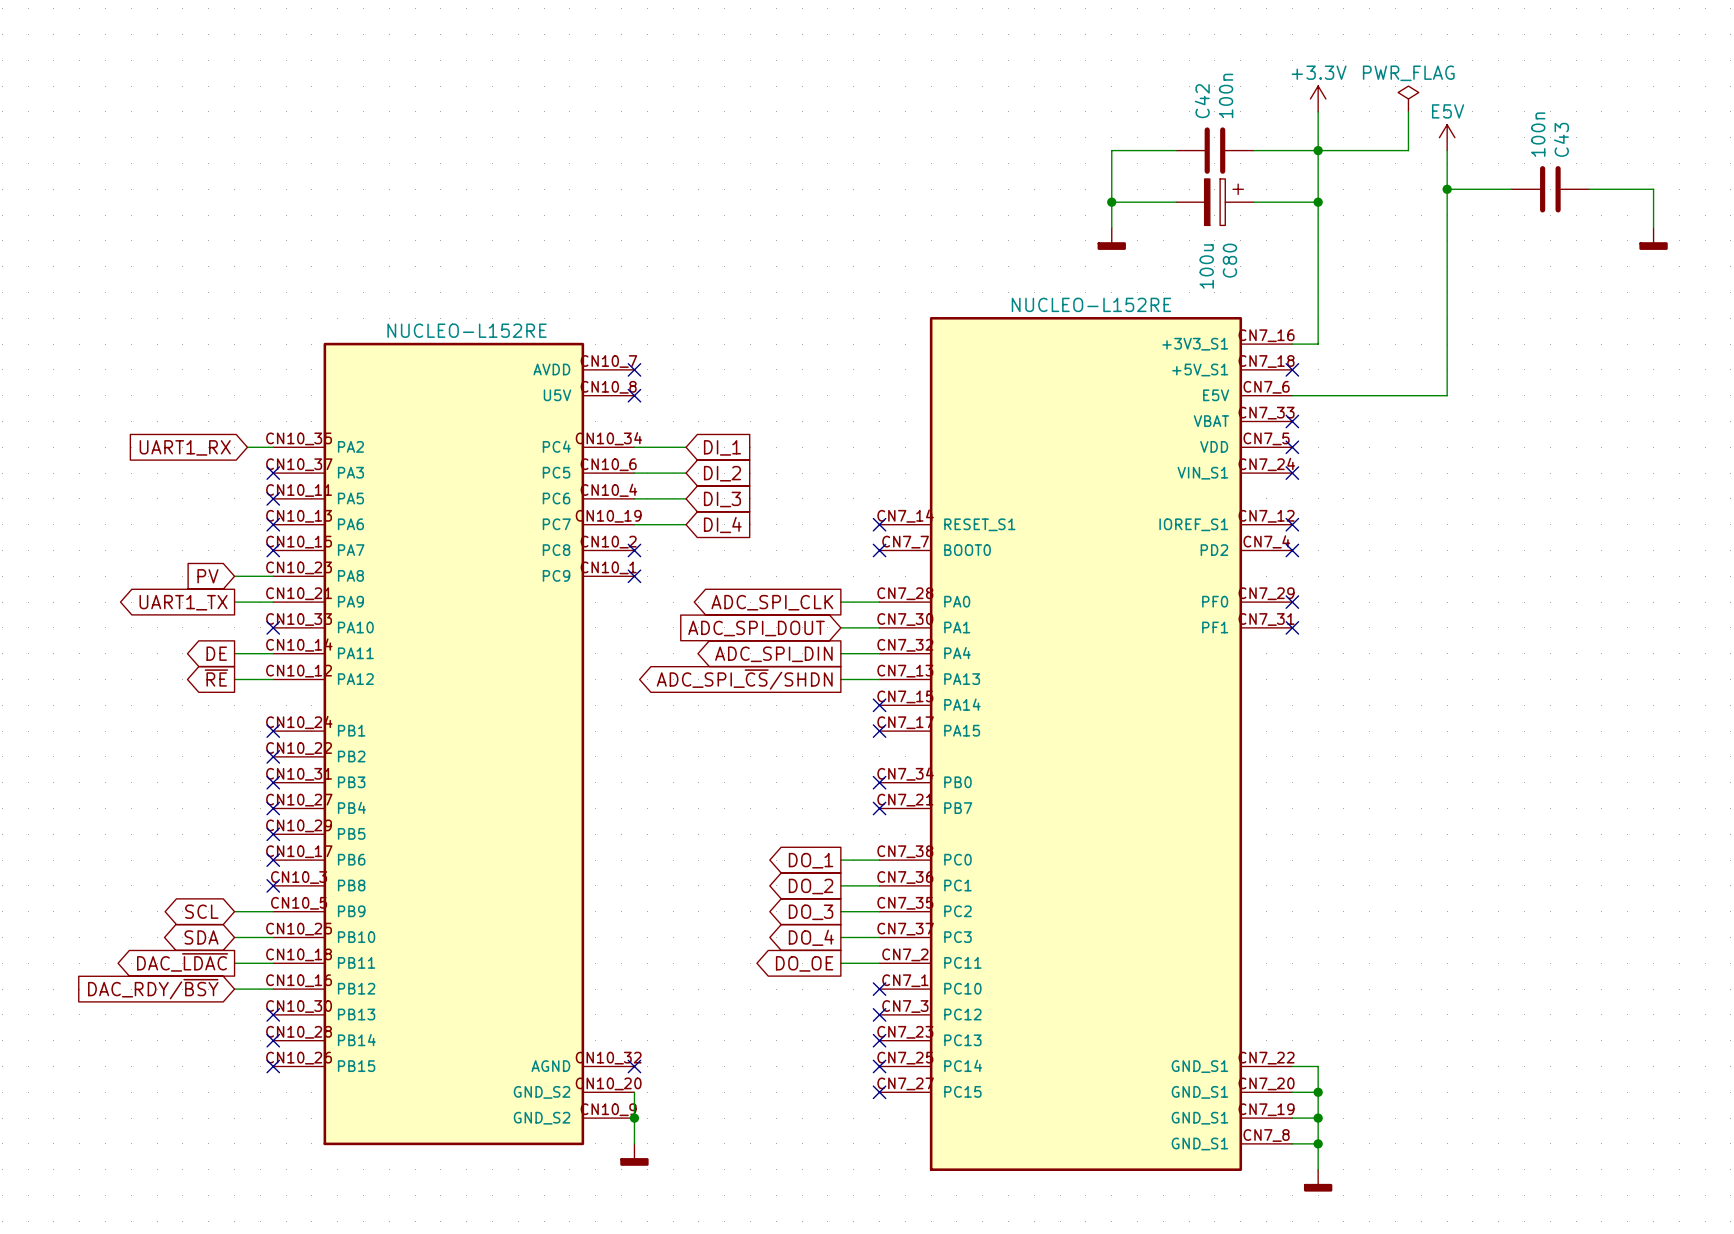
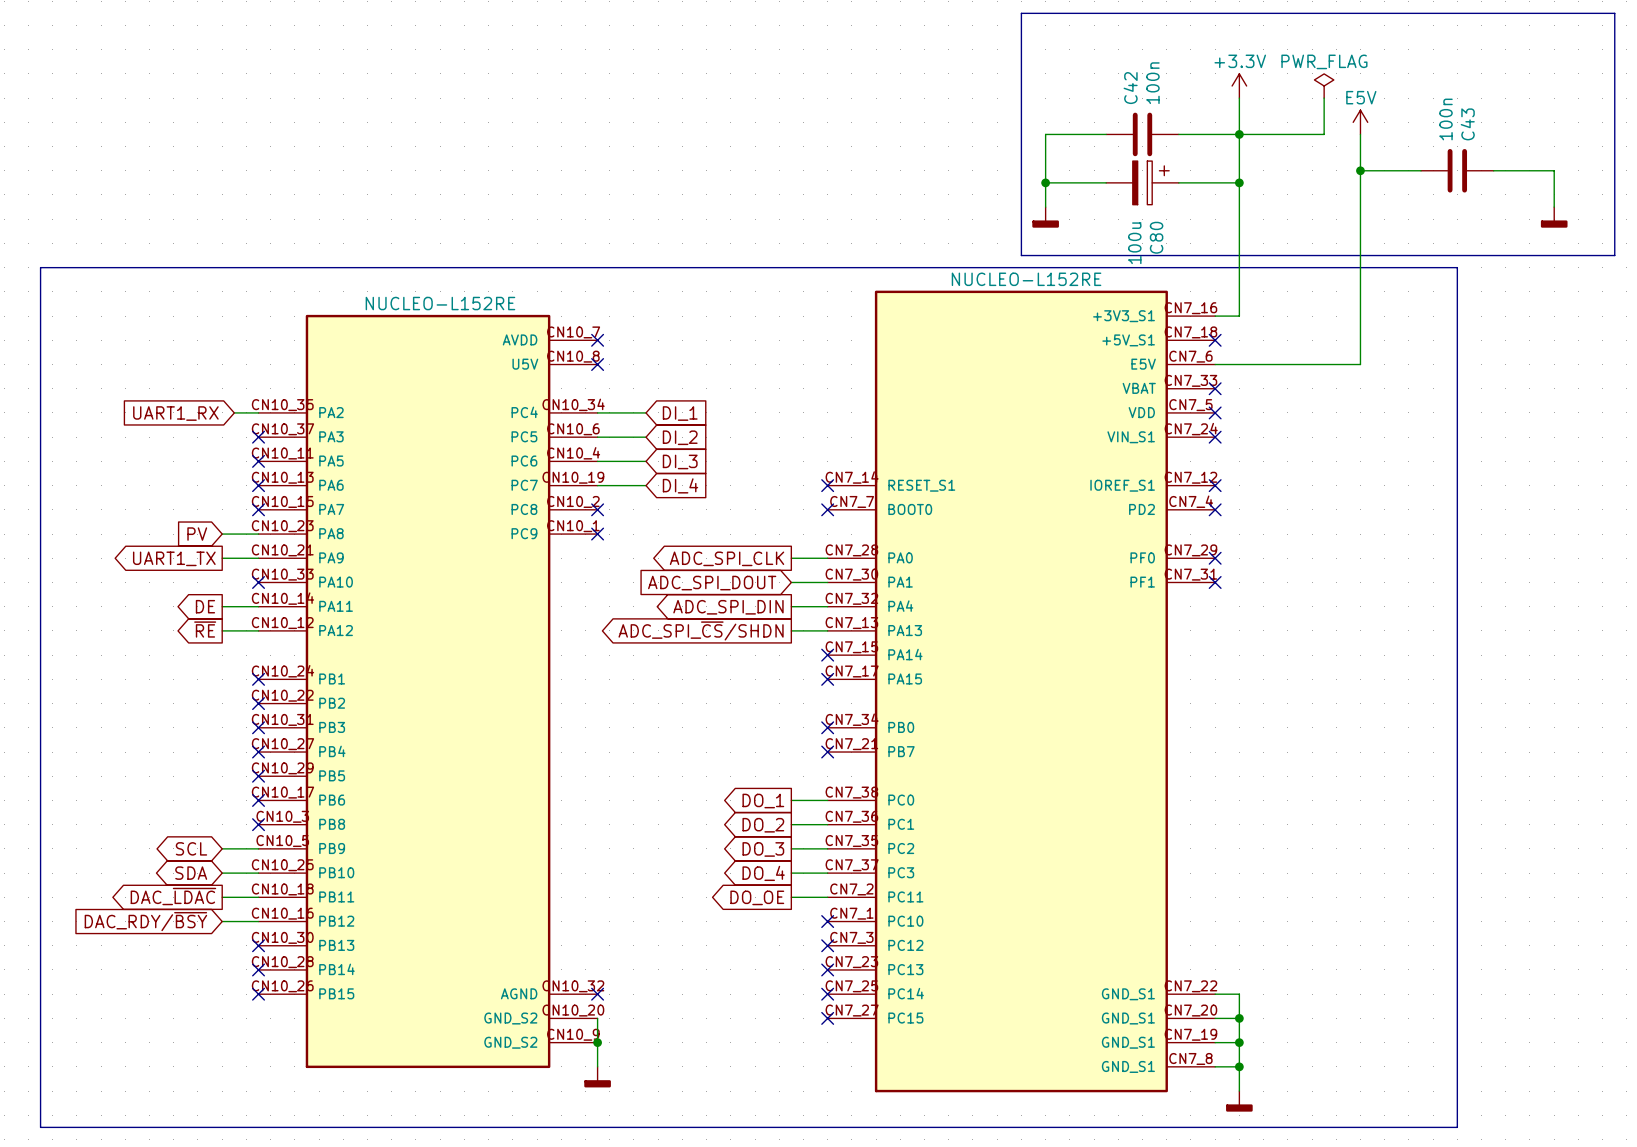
line: none -> (1021, 13) (1614, 13) (1614, 255) (1021, 255) (1021, 13)
line: none -> (40, 267) (1457, 267) (1457, 1127) (40, 1127) (40, 267)

